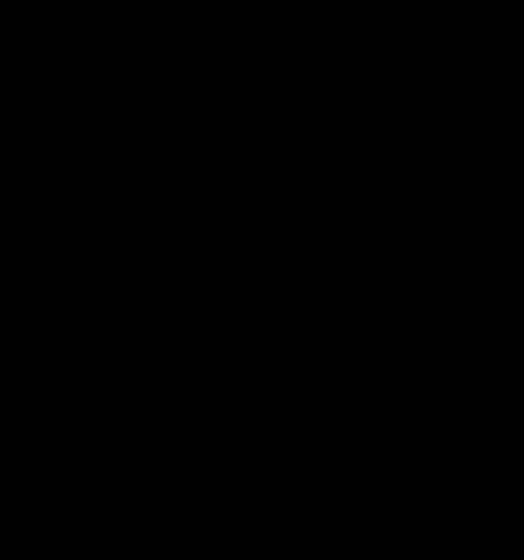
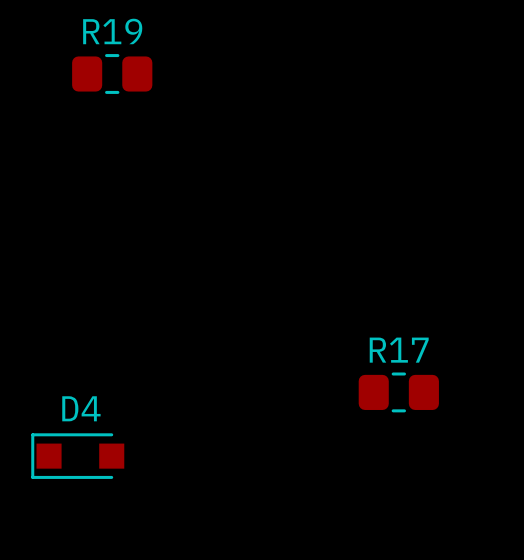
R19: none -> (112, 73)
R17: none -> (398, 392)
D4: none -> (77, 456)

